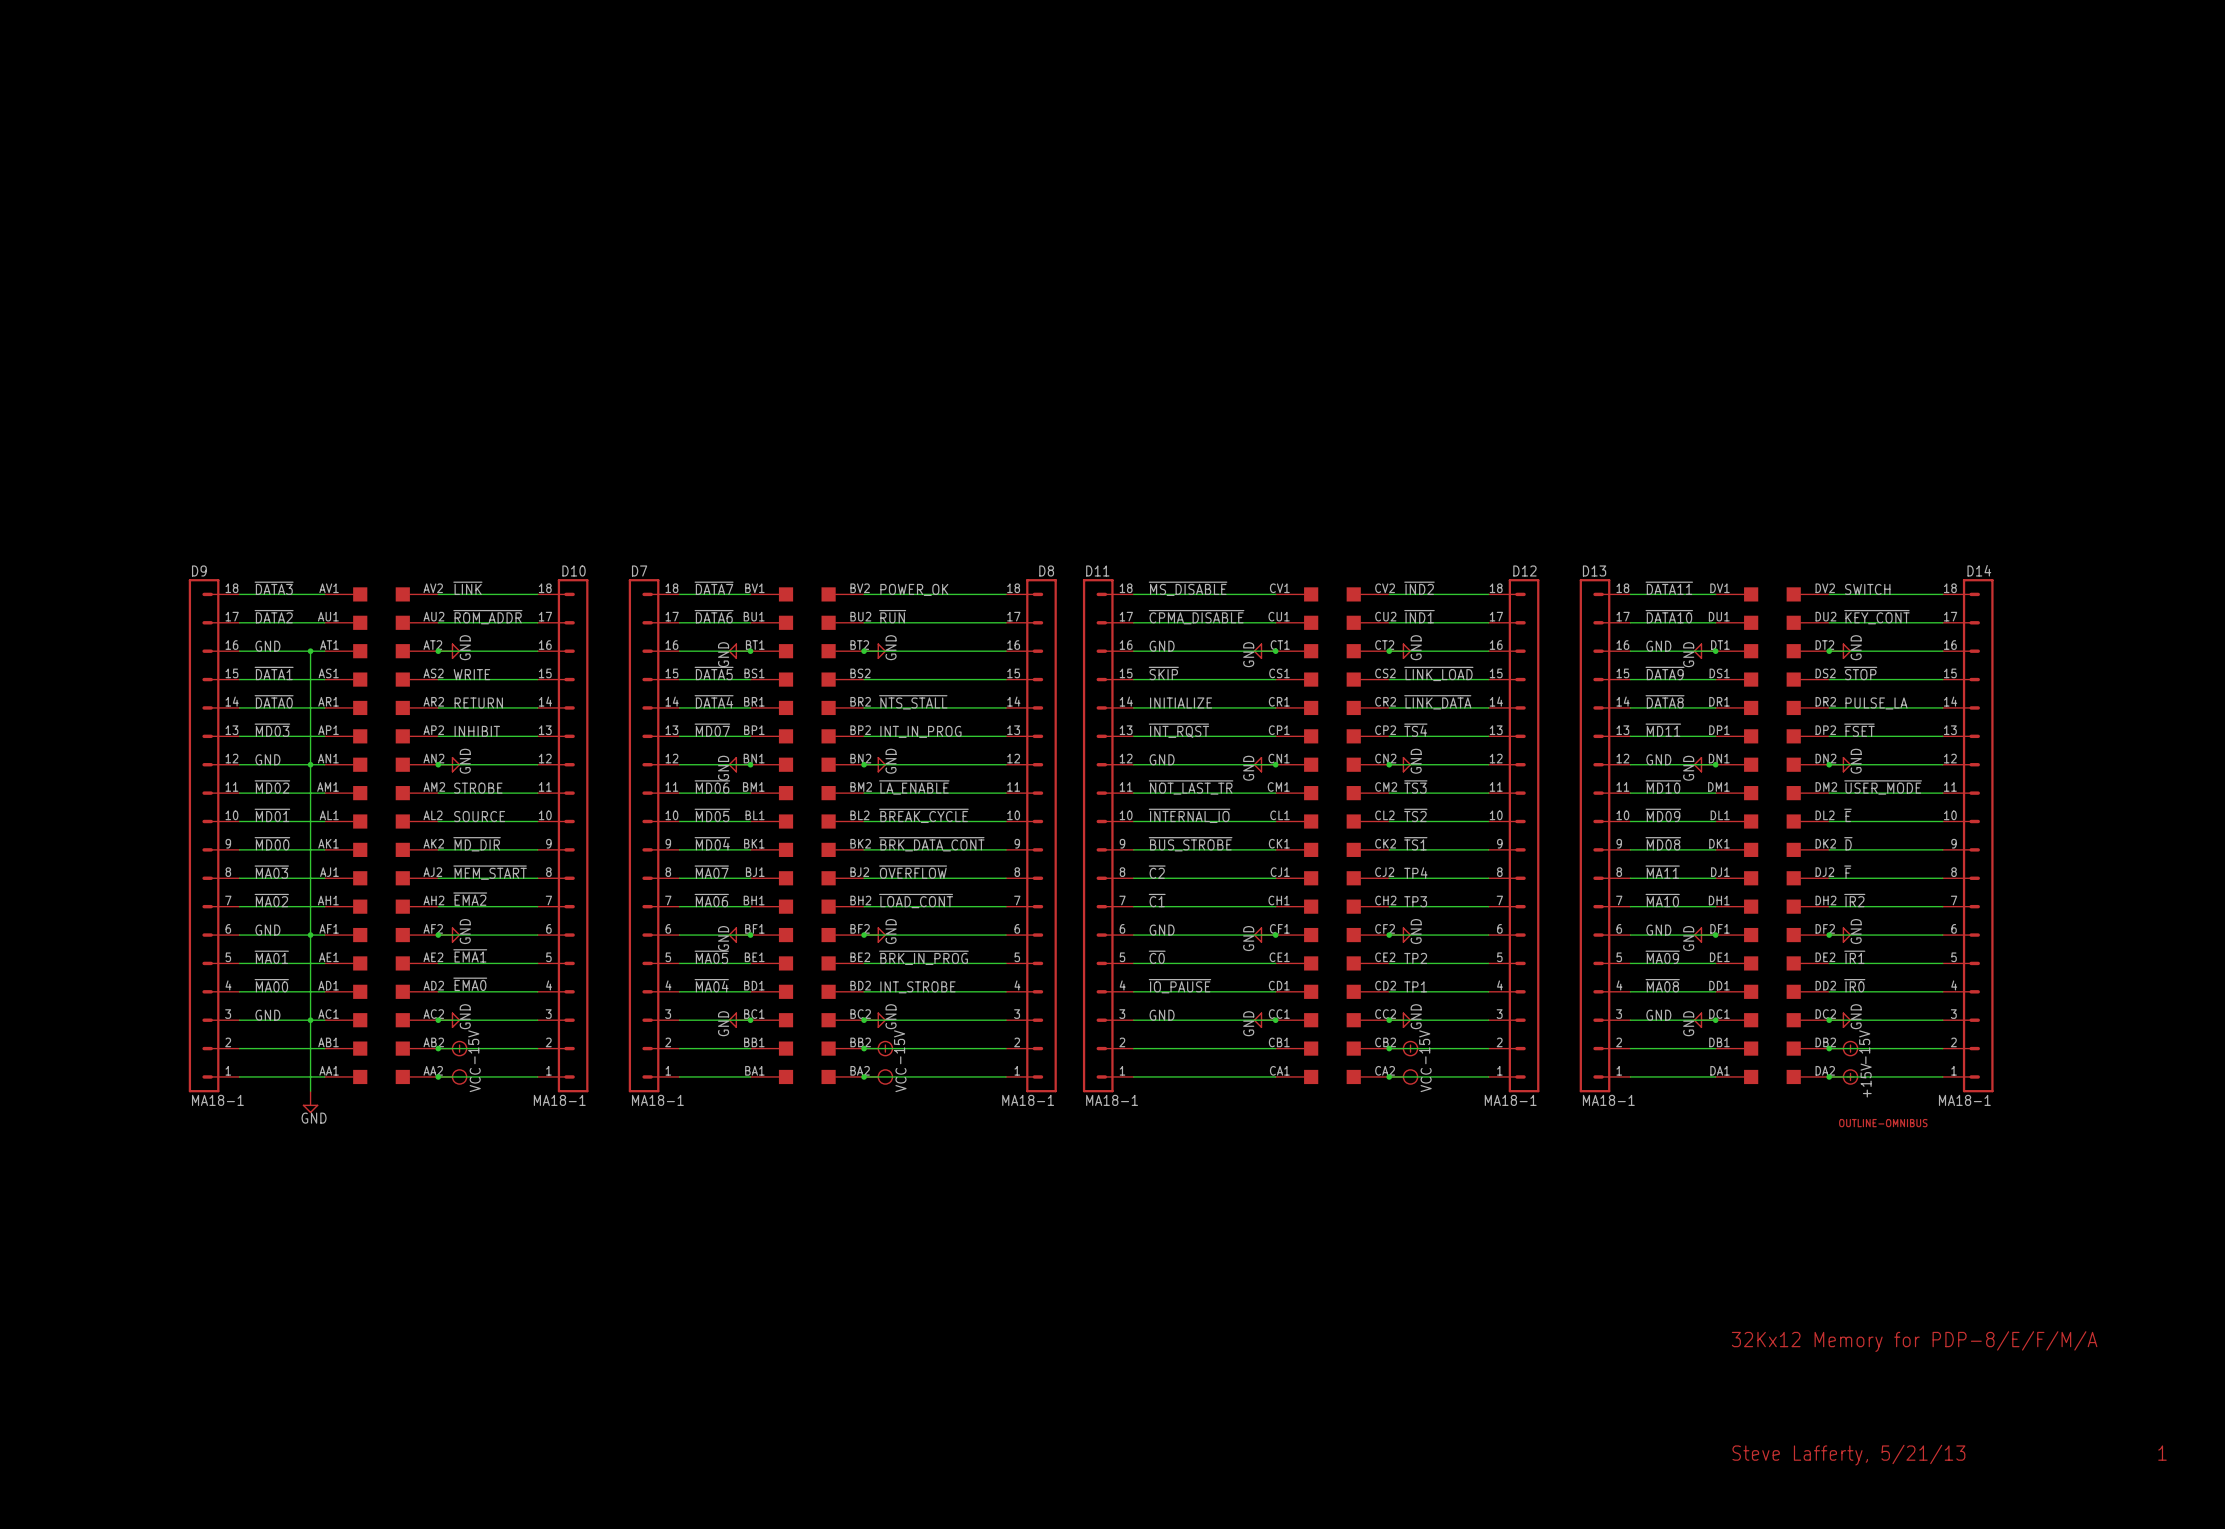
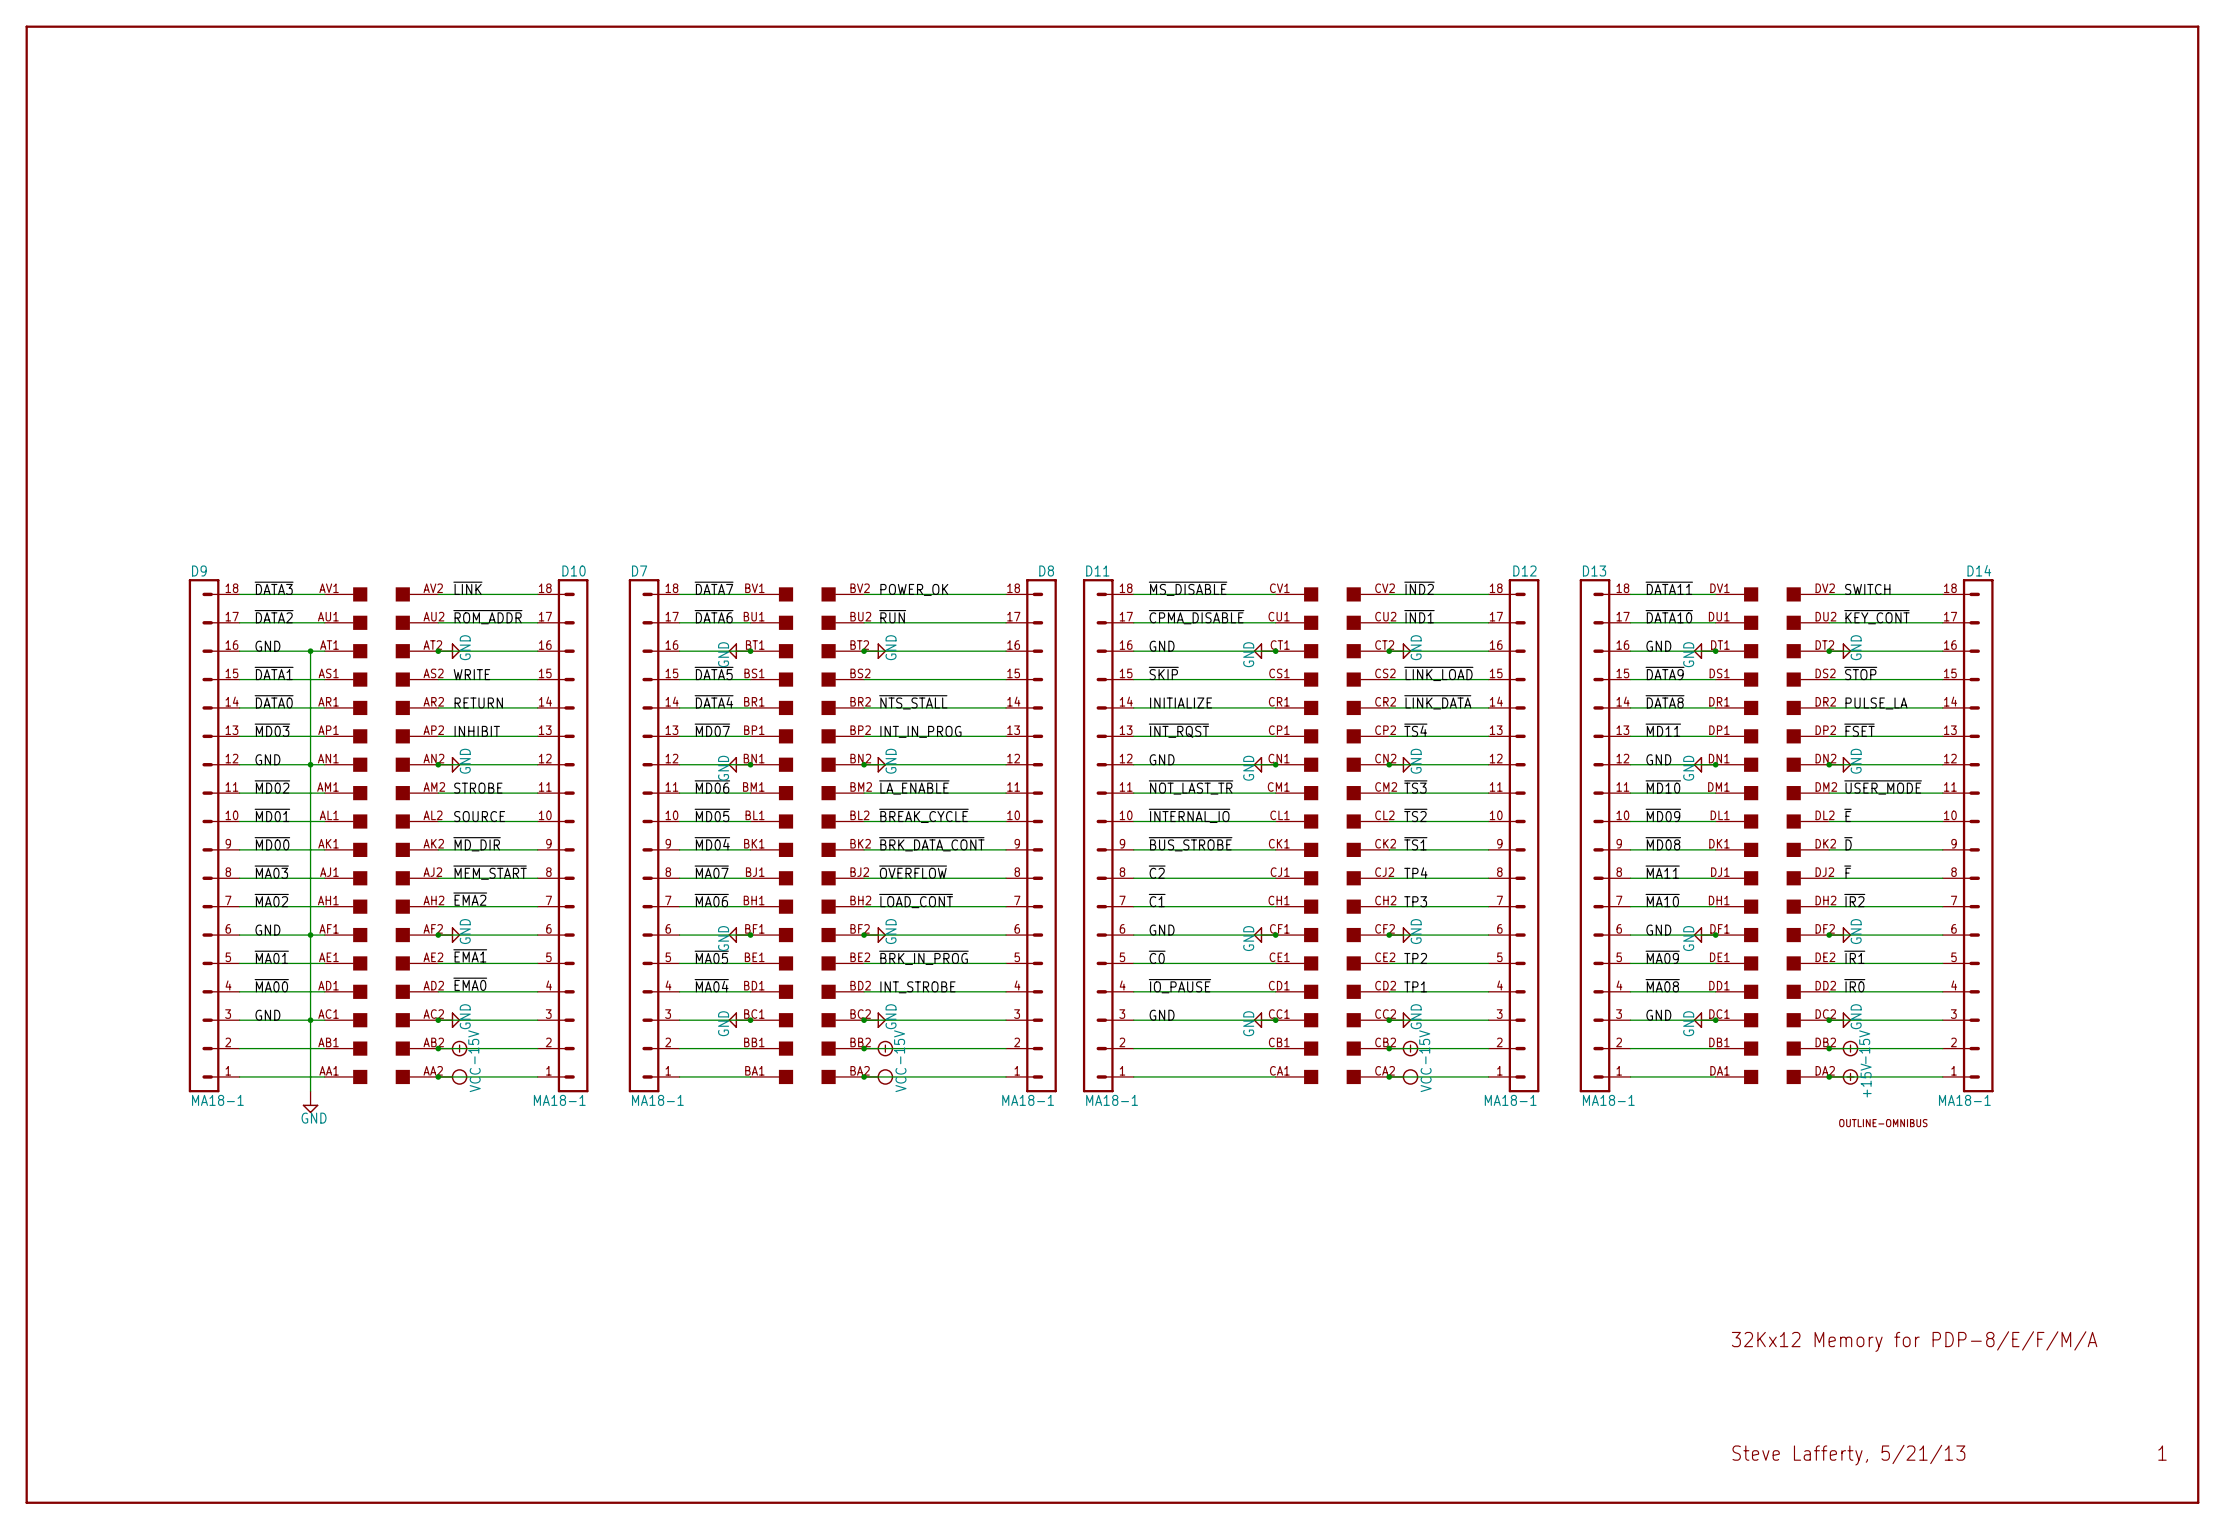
part: none -> (1112, 764)

